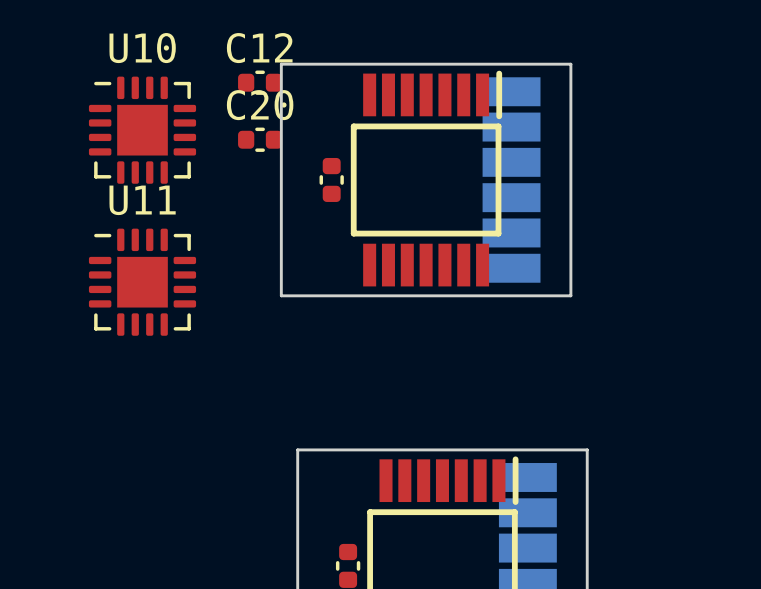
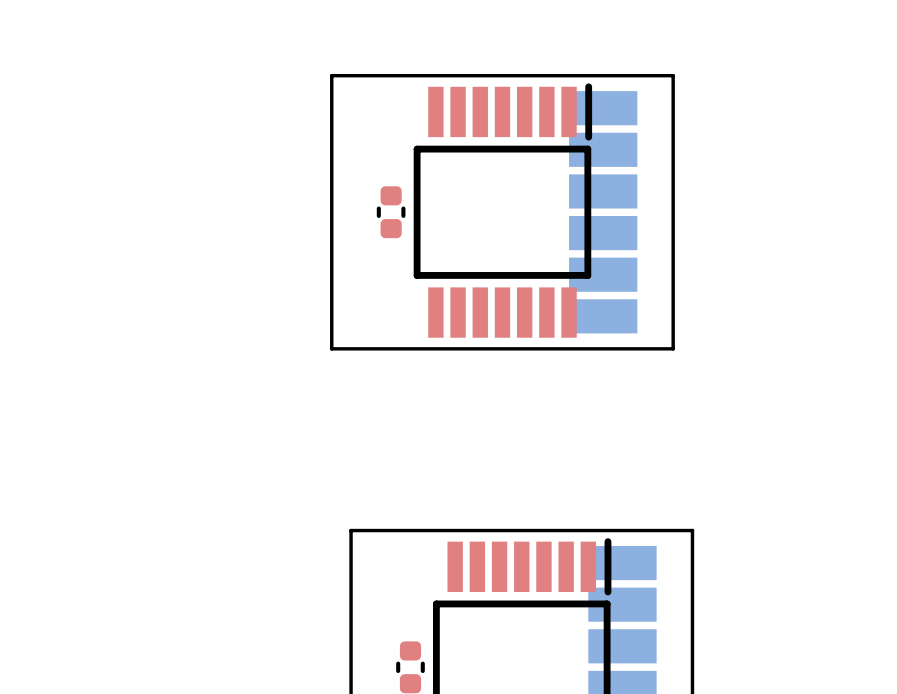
C12: (260, 82) -> none
U10: (142, 130) -> none
C20: (260, 139) -> none
U11: (142, 282) -> none

